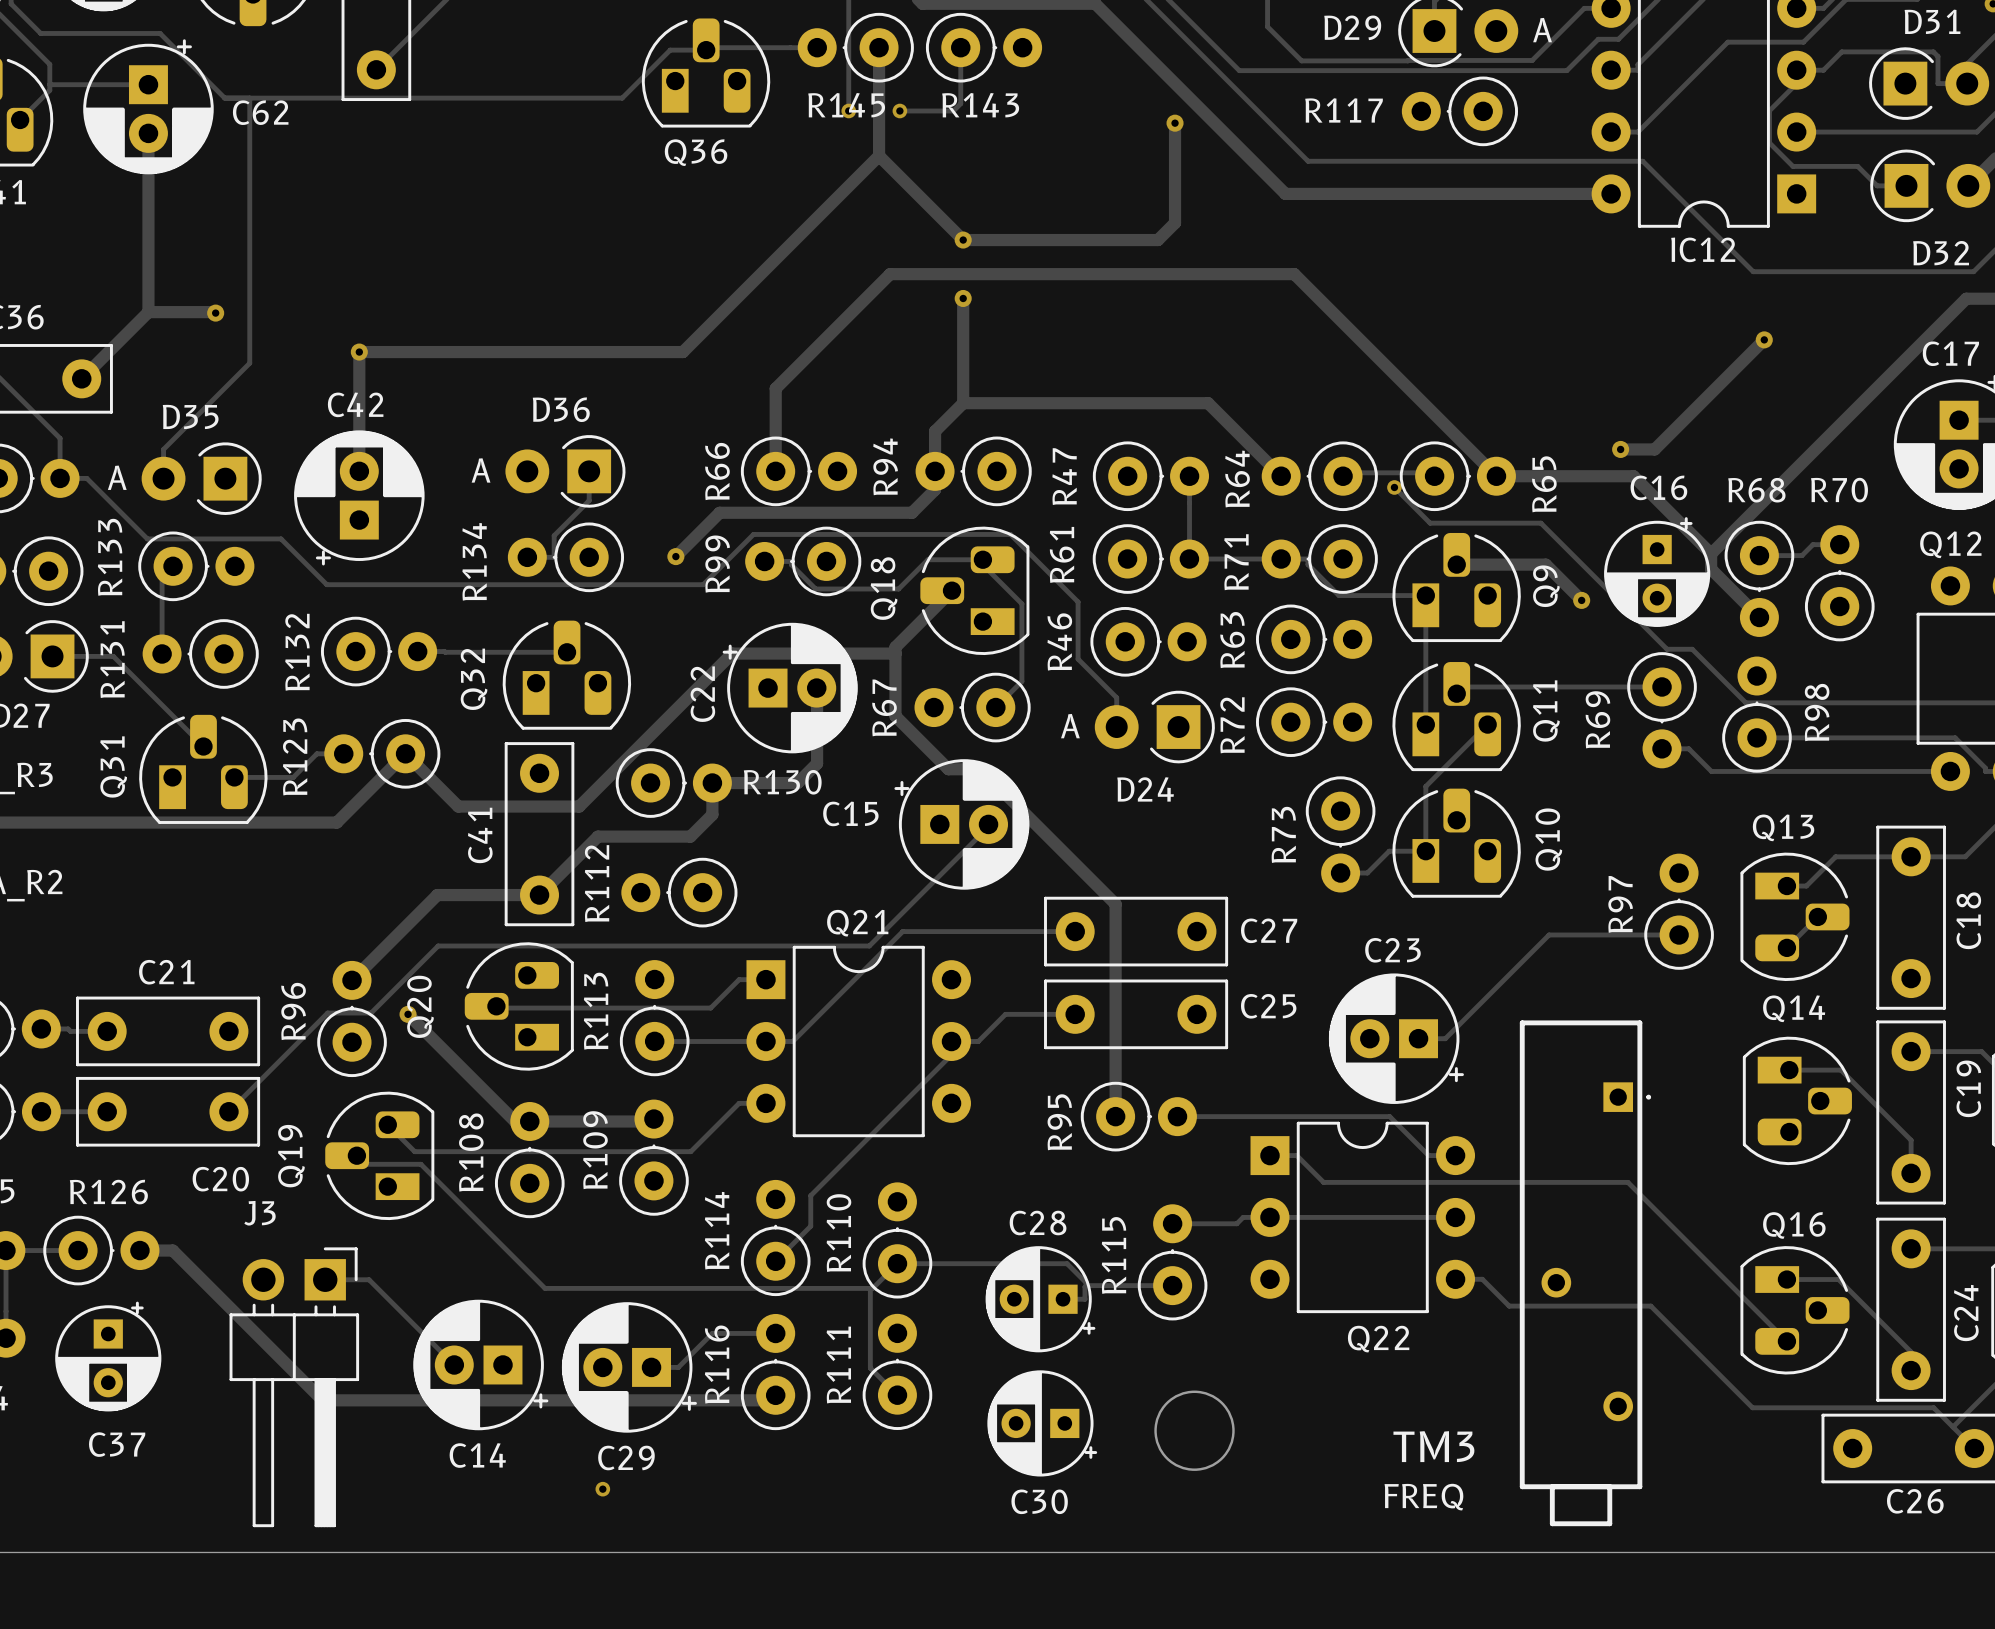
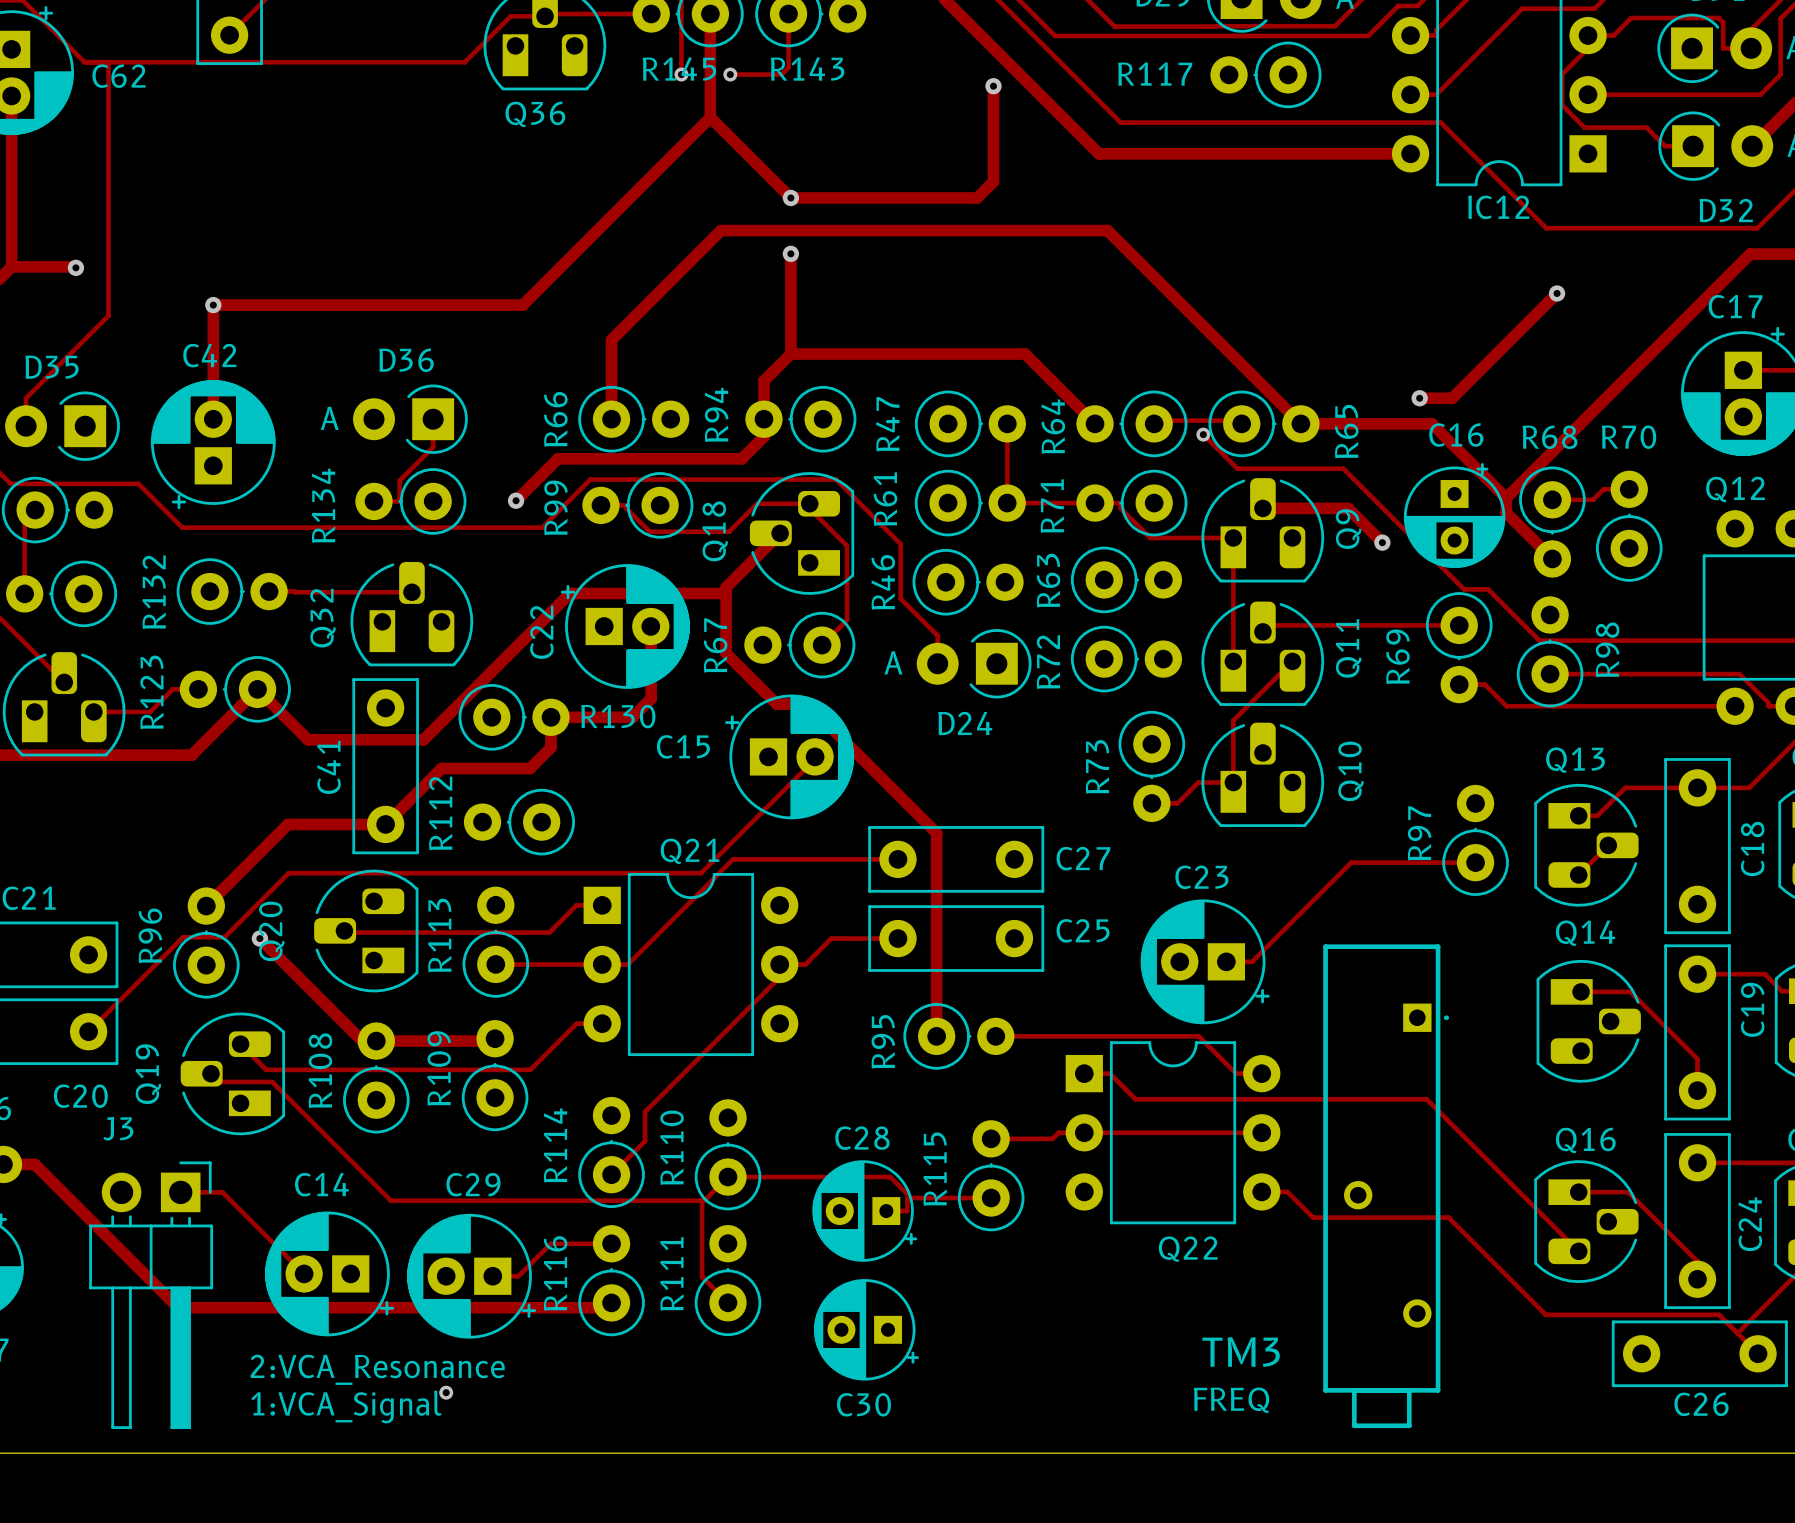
round board edge: [1154, 1390, 1235, 1471] -> none
C14 name position: C14 (477, 1455) -> C14 (321, 1184)
C29 name position: C29 (626, 1457) -> C29 (473, 1184)
text: none -> 2:VCA_Resonance (377, 1369)
text: none -> 1:VCA_Signal (346, 1407)

